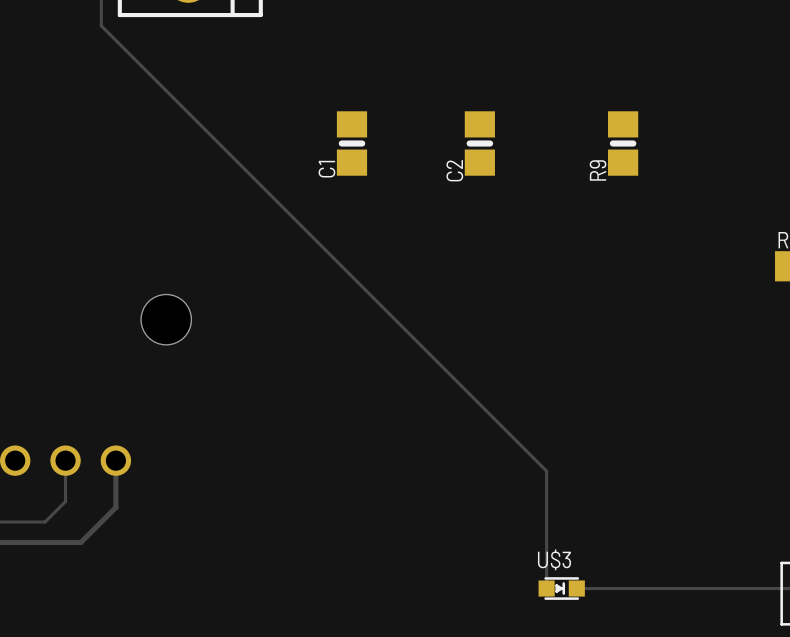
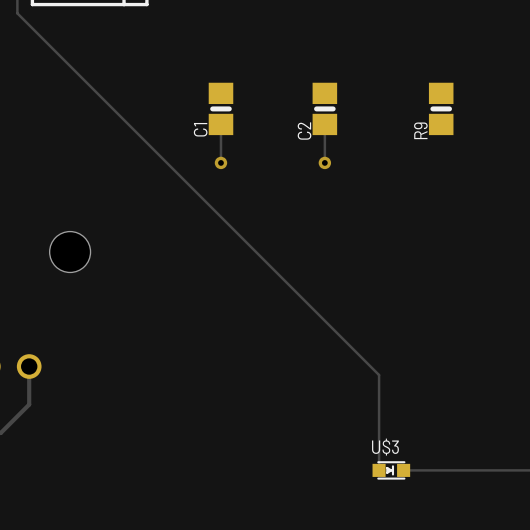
track: none -> (220, 124) (220, 162)
track: none -> (324, 124) (324, 162)
via: none -> (220, 162)
via: none -> (324, 162)

